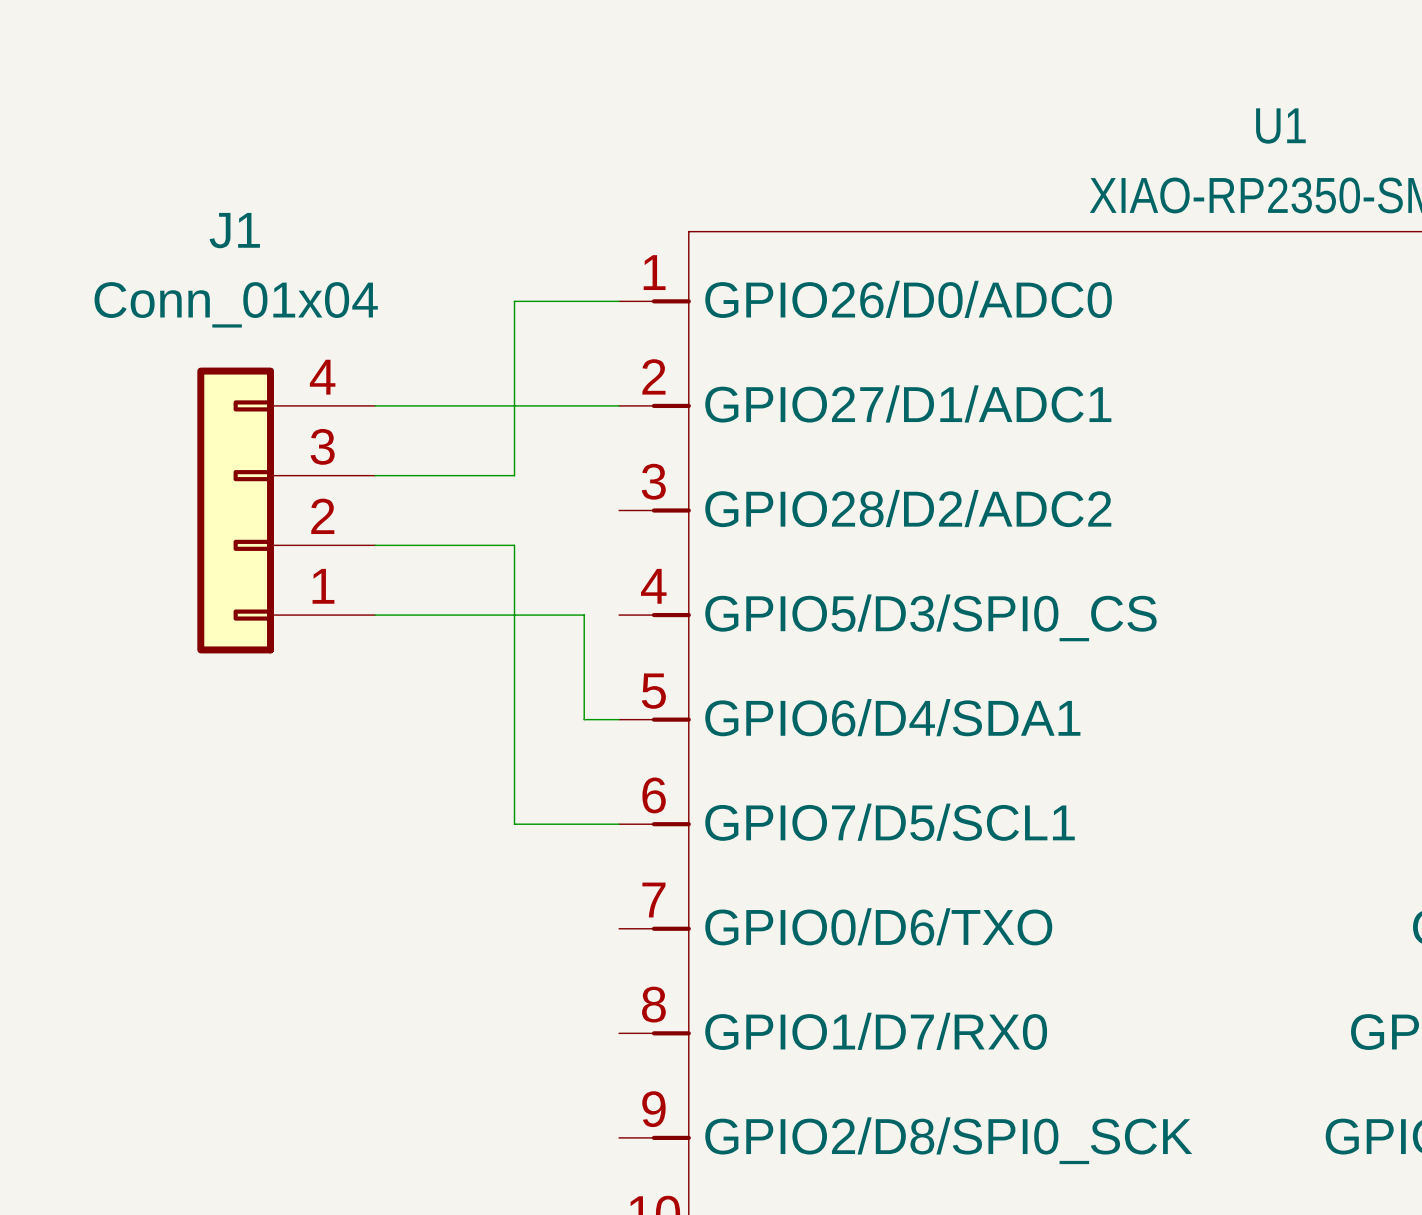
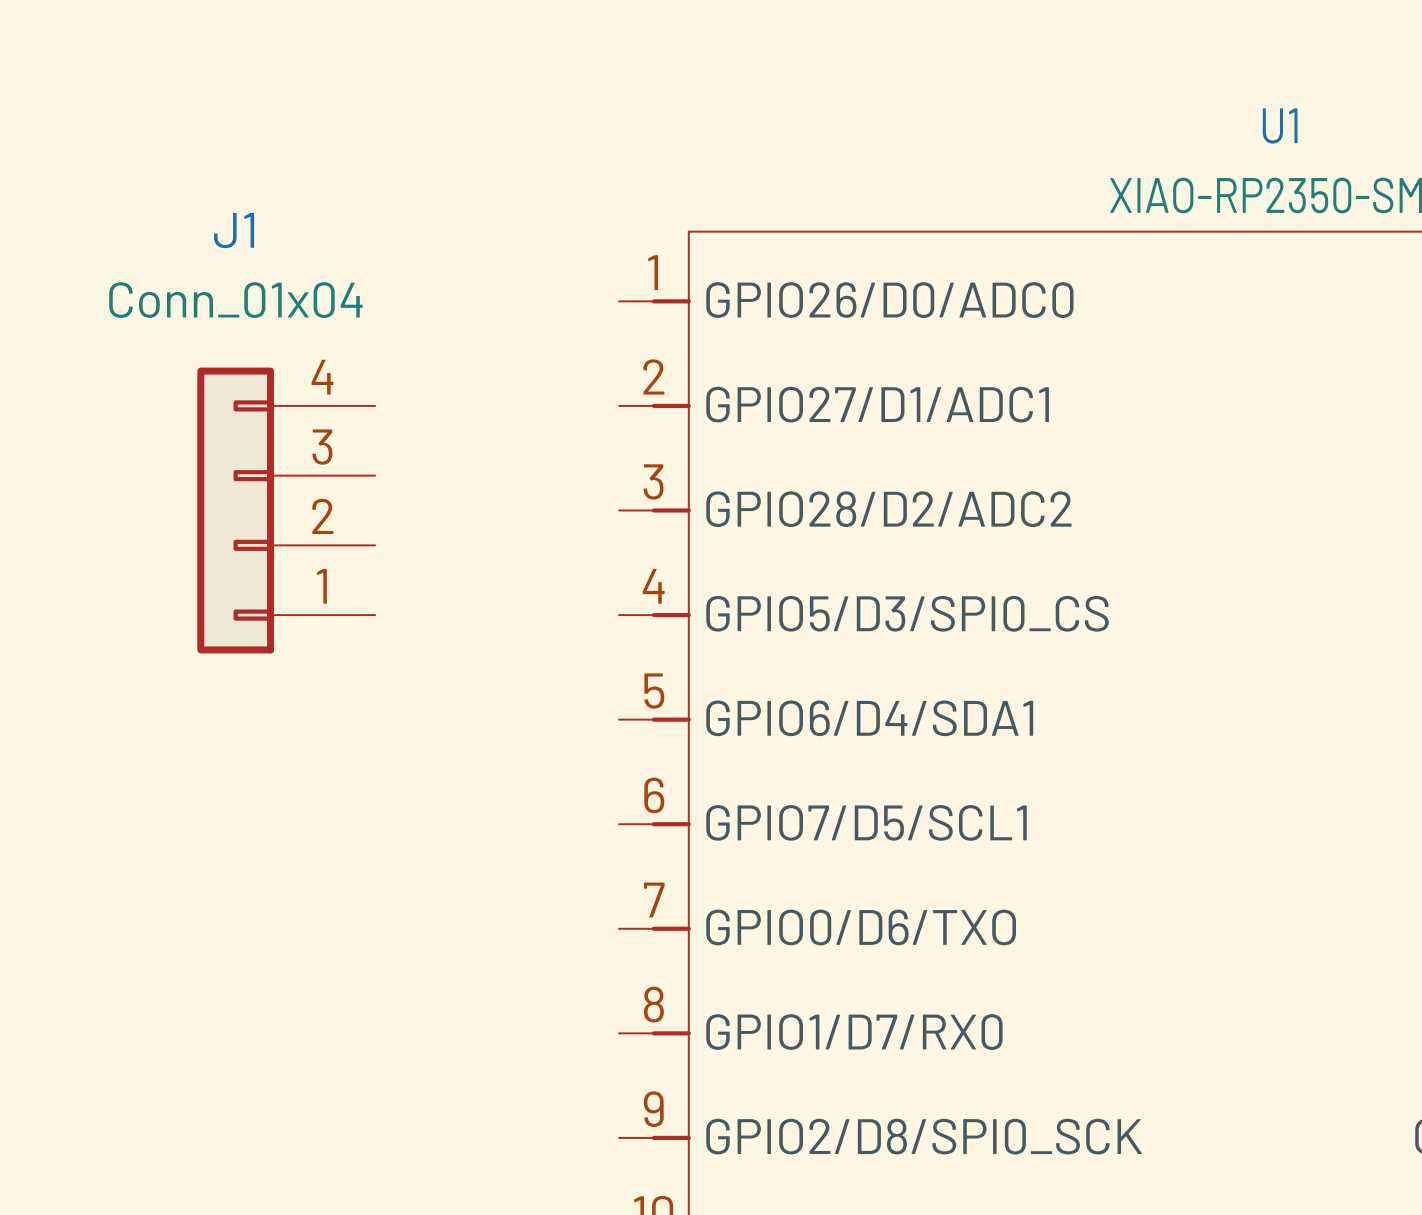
wire: (619, 301) (514, 301) (514, 475) (375, 475) -> none
wire: (375, 405) (619, 405) -> none
wire: (375, 545) (514, 545) (514, 824) (619, 824) -> none
wire: (375, 615) (584, 615) (584, 719) (619, 719) -> none

